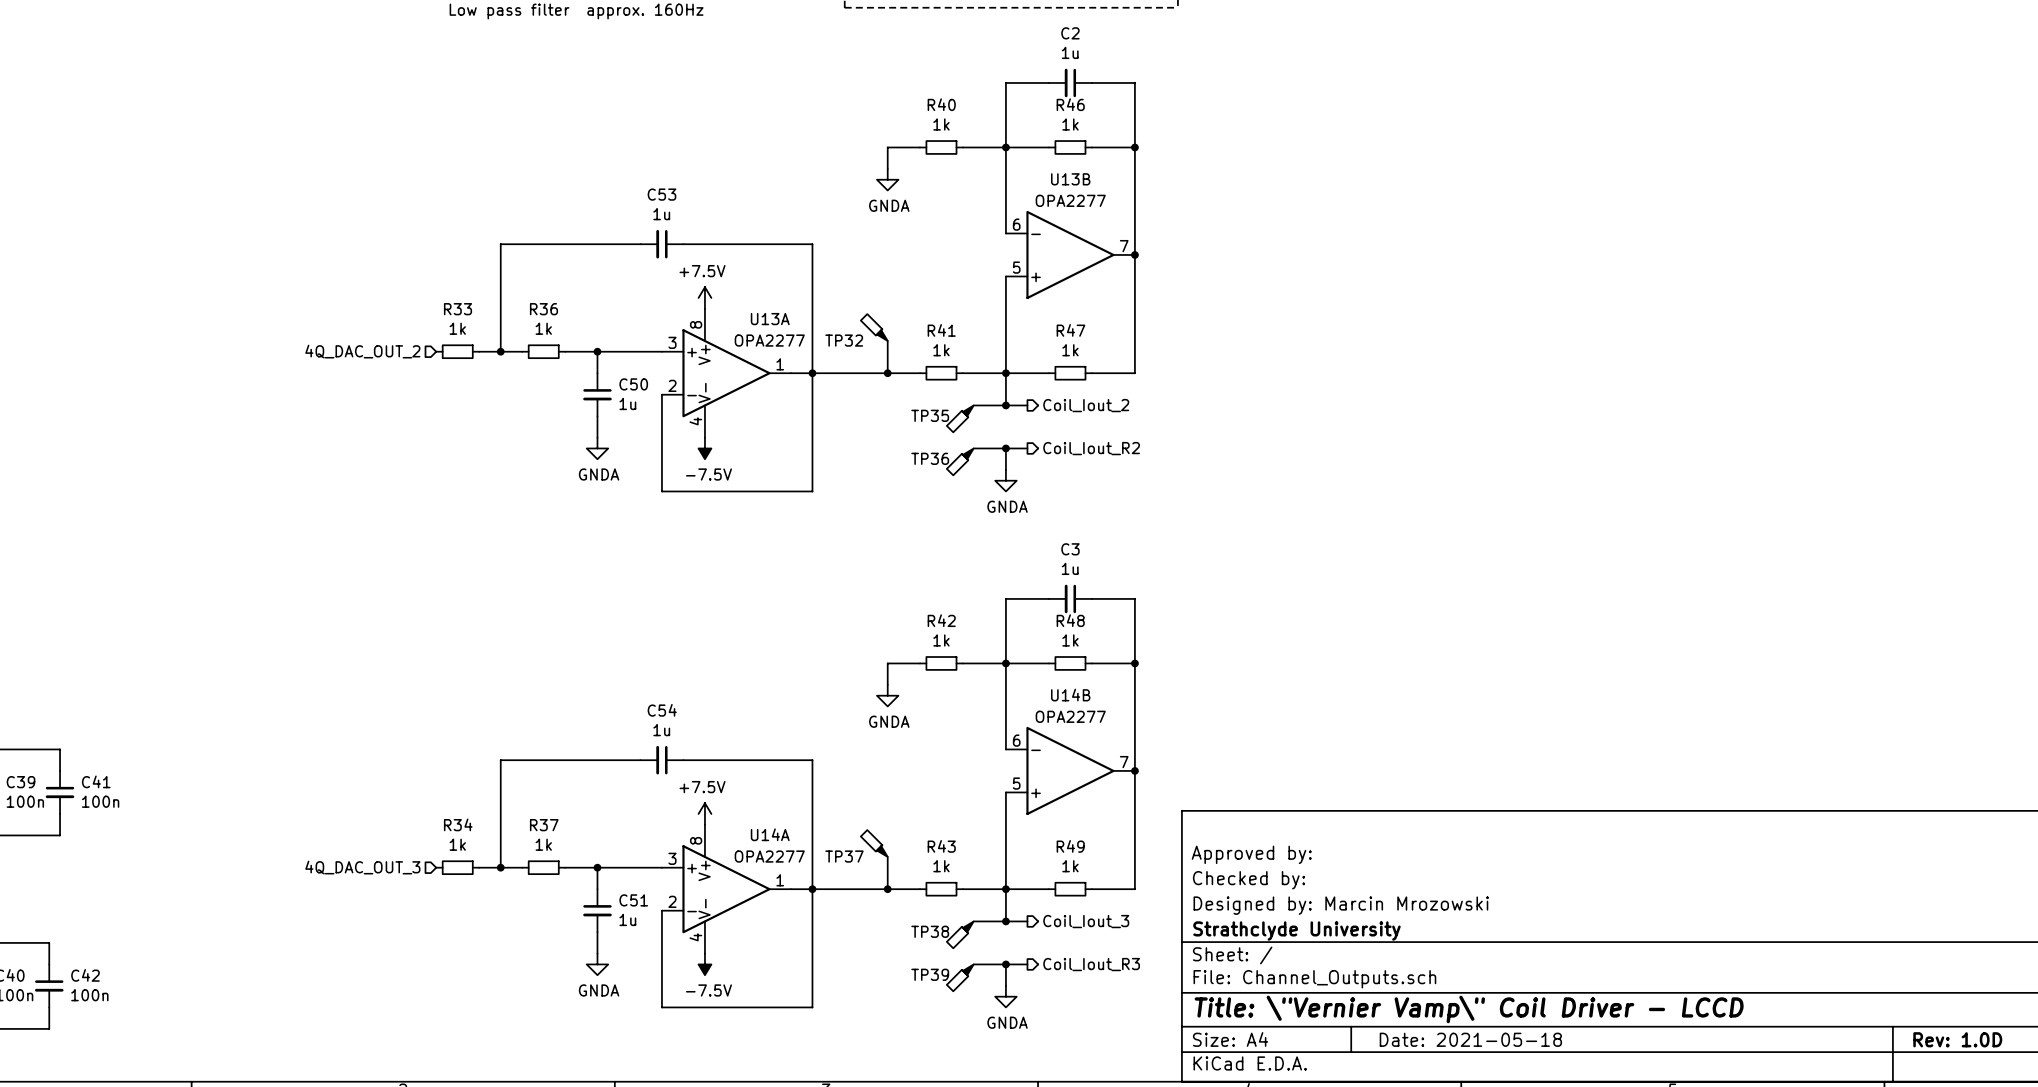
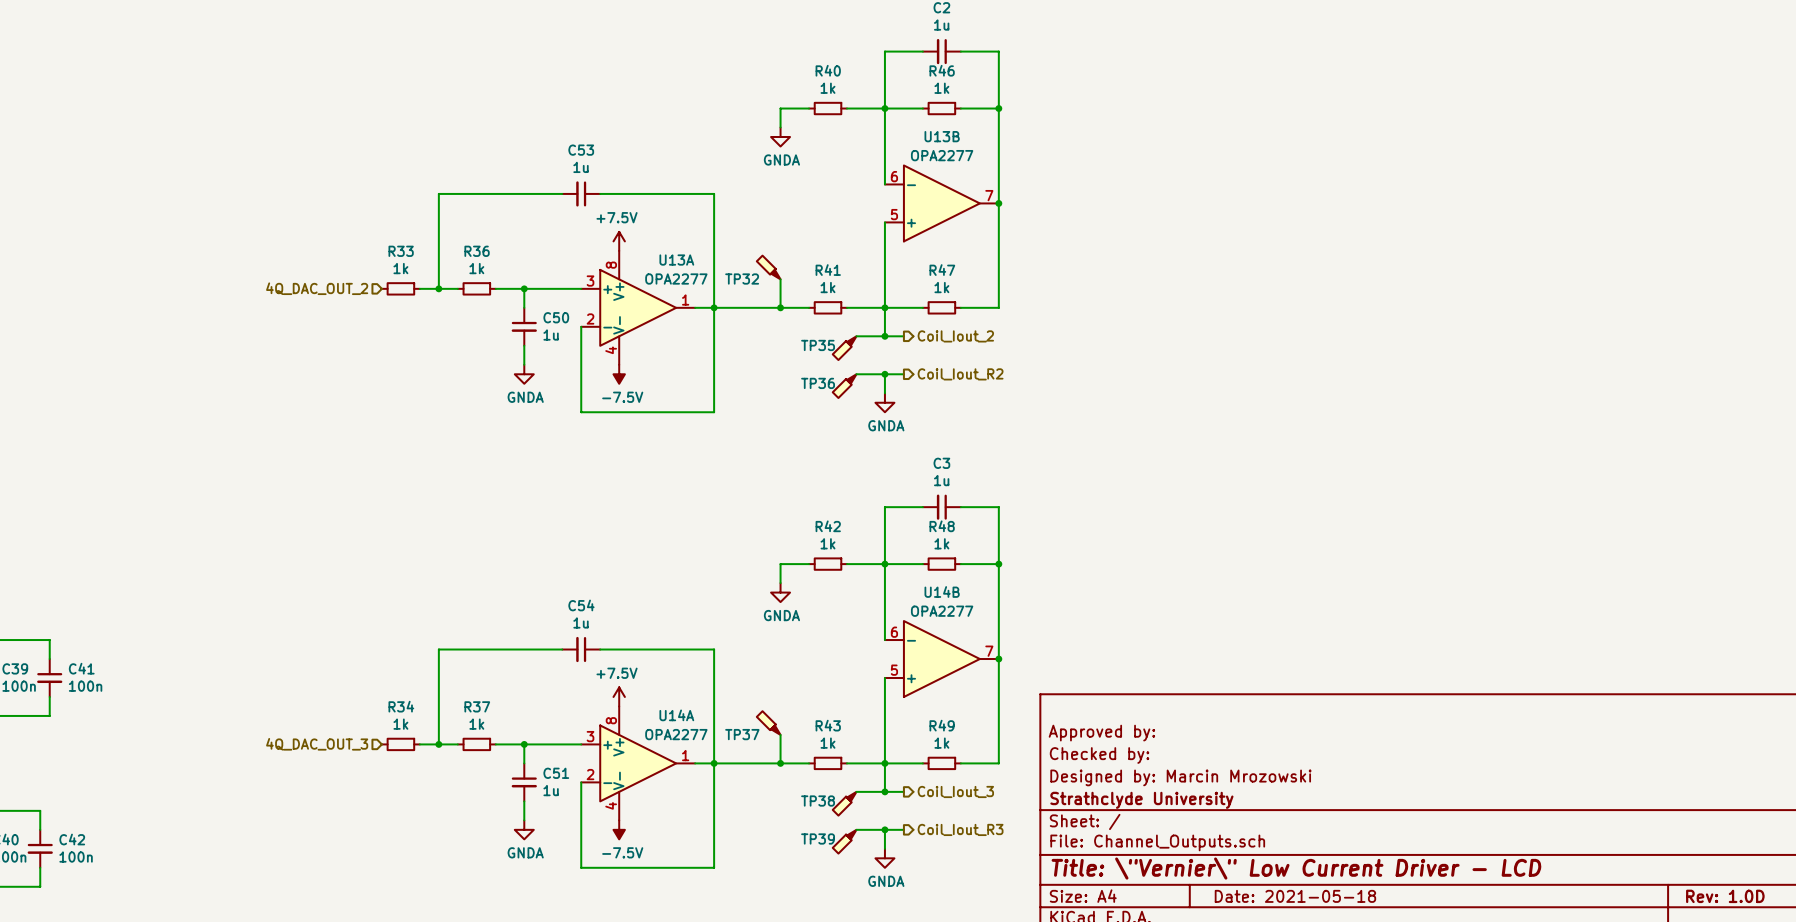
title block: Title: \"Vernier Vamp\" Coil Driver - LCCD (1469, 1009) -> Title: \"Vernier\" Low Current Driver - LCD (1296, 868)

